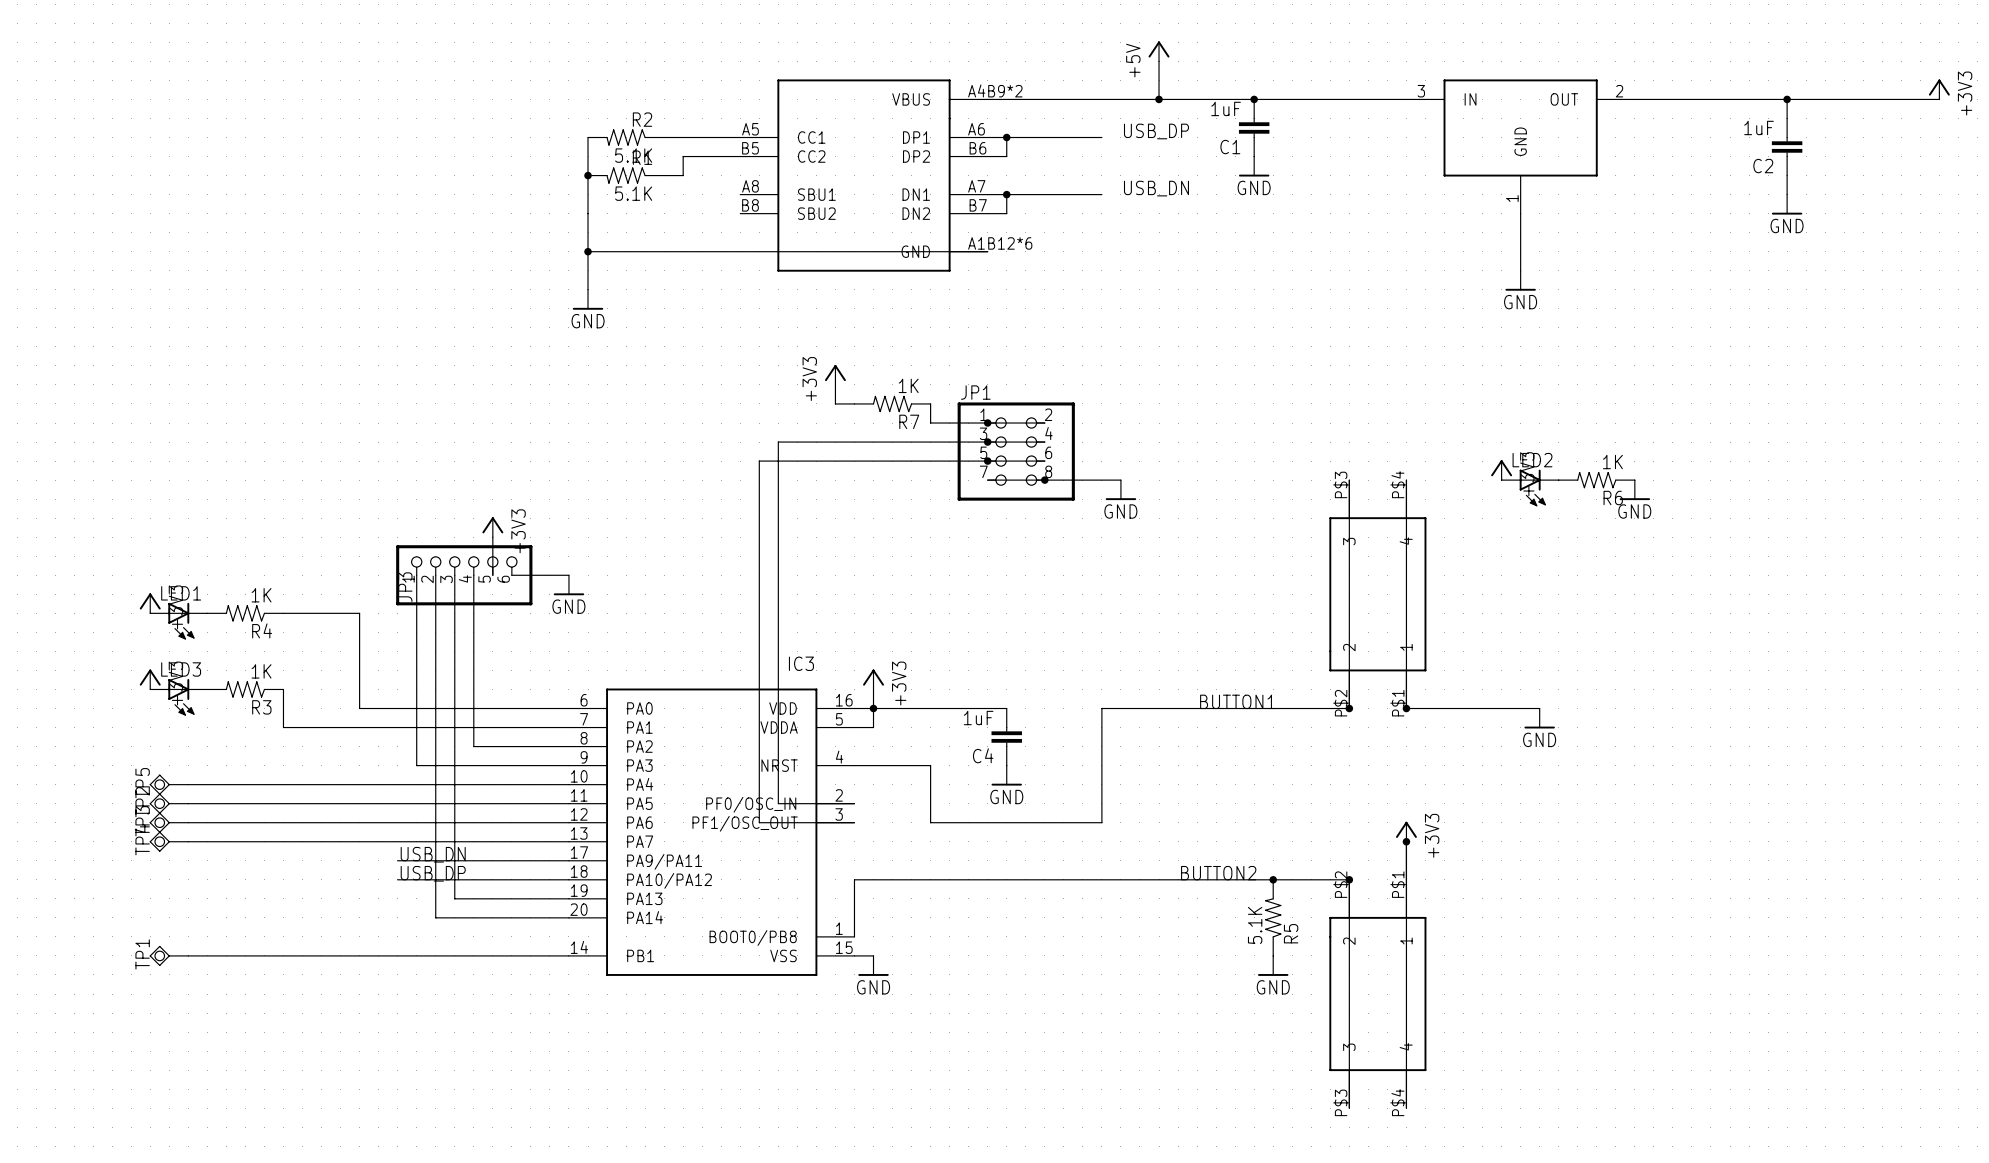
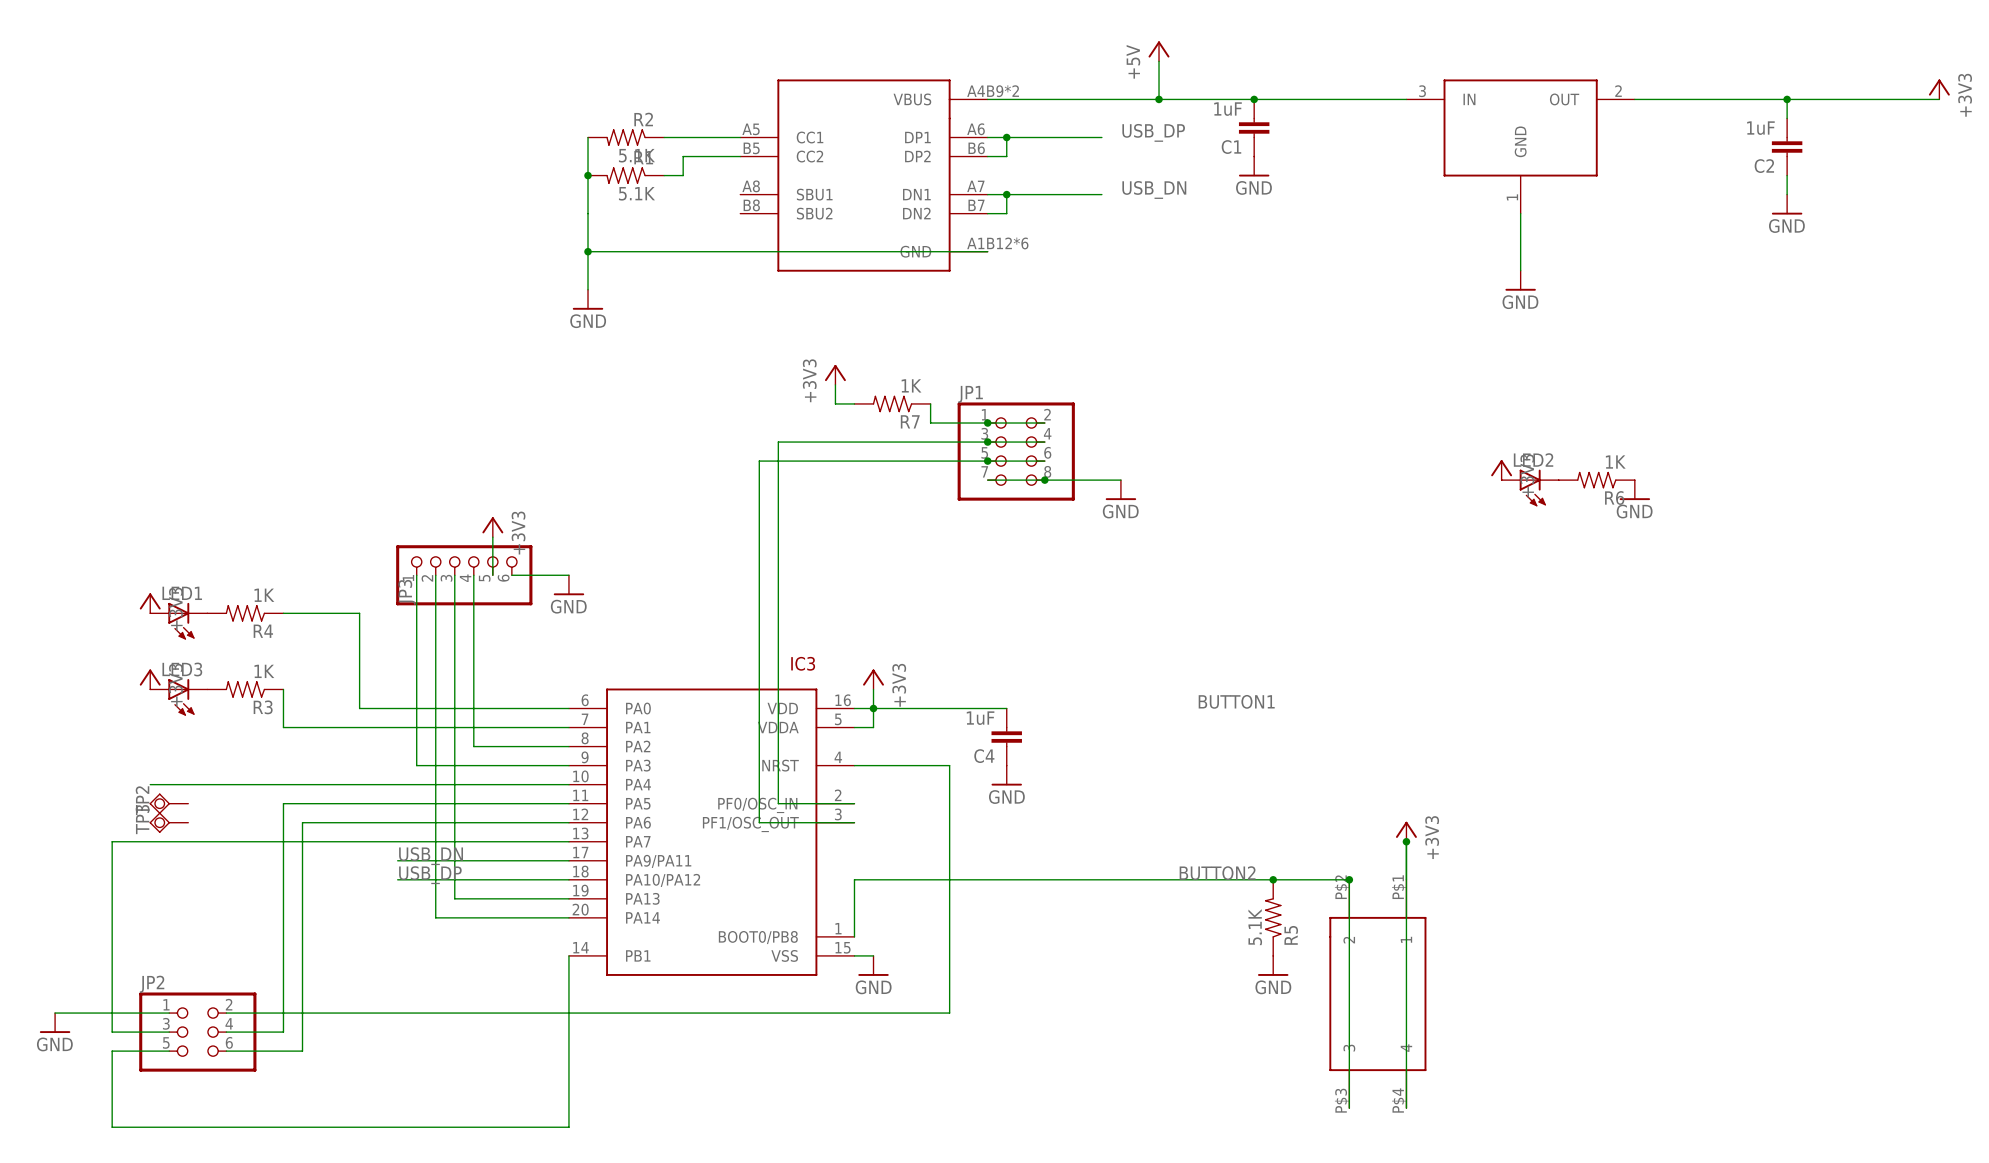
wire: (1349, 480) (1349, 708) (1101, 708) (1101, 822) (930, 822) (930, 765) -> (226, 1013) (949, 1013) (949, 765) (930, 765)
wire: (1406, 480) (1406, 708) (1539, 708) -> none
part: (1377, 594) -> none
junction: (1349, 708) -> none
junction: (1406, 708) -> none
power symbol: GND (1539, 718) -> none
TP5: (168, 784) -> none
wire: (188, 803) (283, 803) -> (226, 1032) (283, 1032) (283, 803)
wire: (188, 822) (302, 822) -> (226, 1051) (302, 1051) (302, 822)
TP4: (168, 841) -> none
wire: none -> (188, 841) (112, 841) (112, 1032) (169, 1032)
TP1: (168, 955) -> none
wire: (188, 955) (568, 955) -> (169, 1051) (112, 1051) (112, 1127) (568, 1127) (568, 955)
wire: none -> (55, 1013) (169, 1013)
power symbol: none -> GND (55, 1023)
JP2: none -> (197, 1032)

